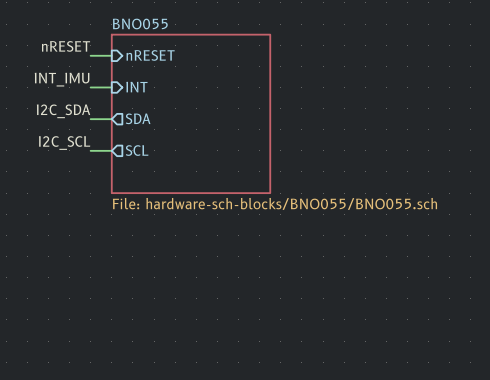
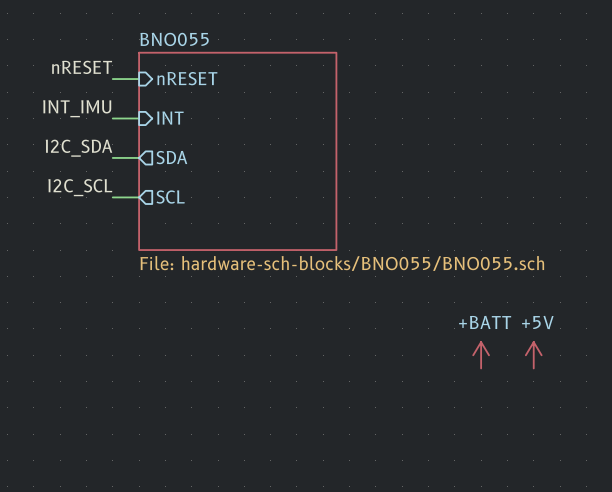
power symbol: none -> +BATT (481, 355)
power symbol: none -> +5V (533, 355)

